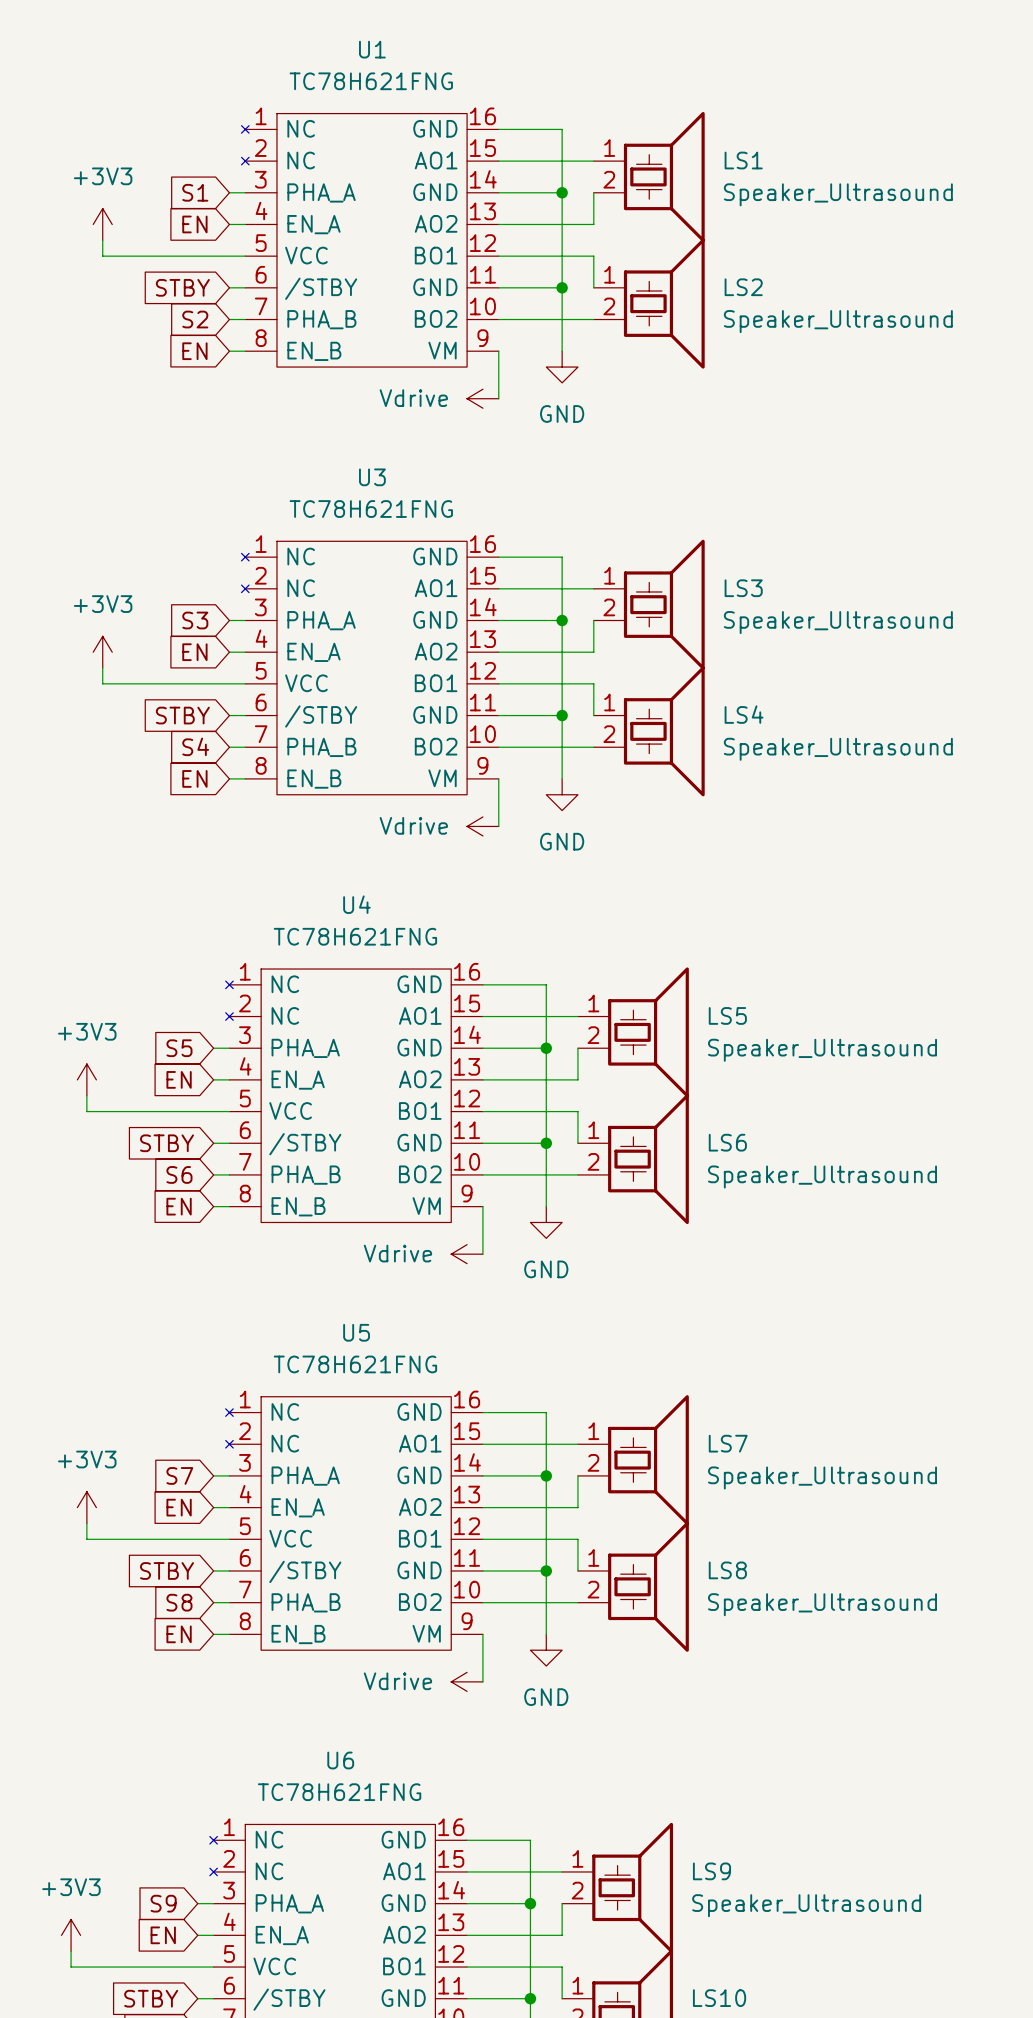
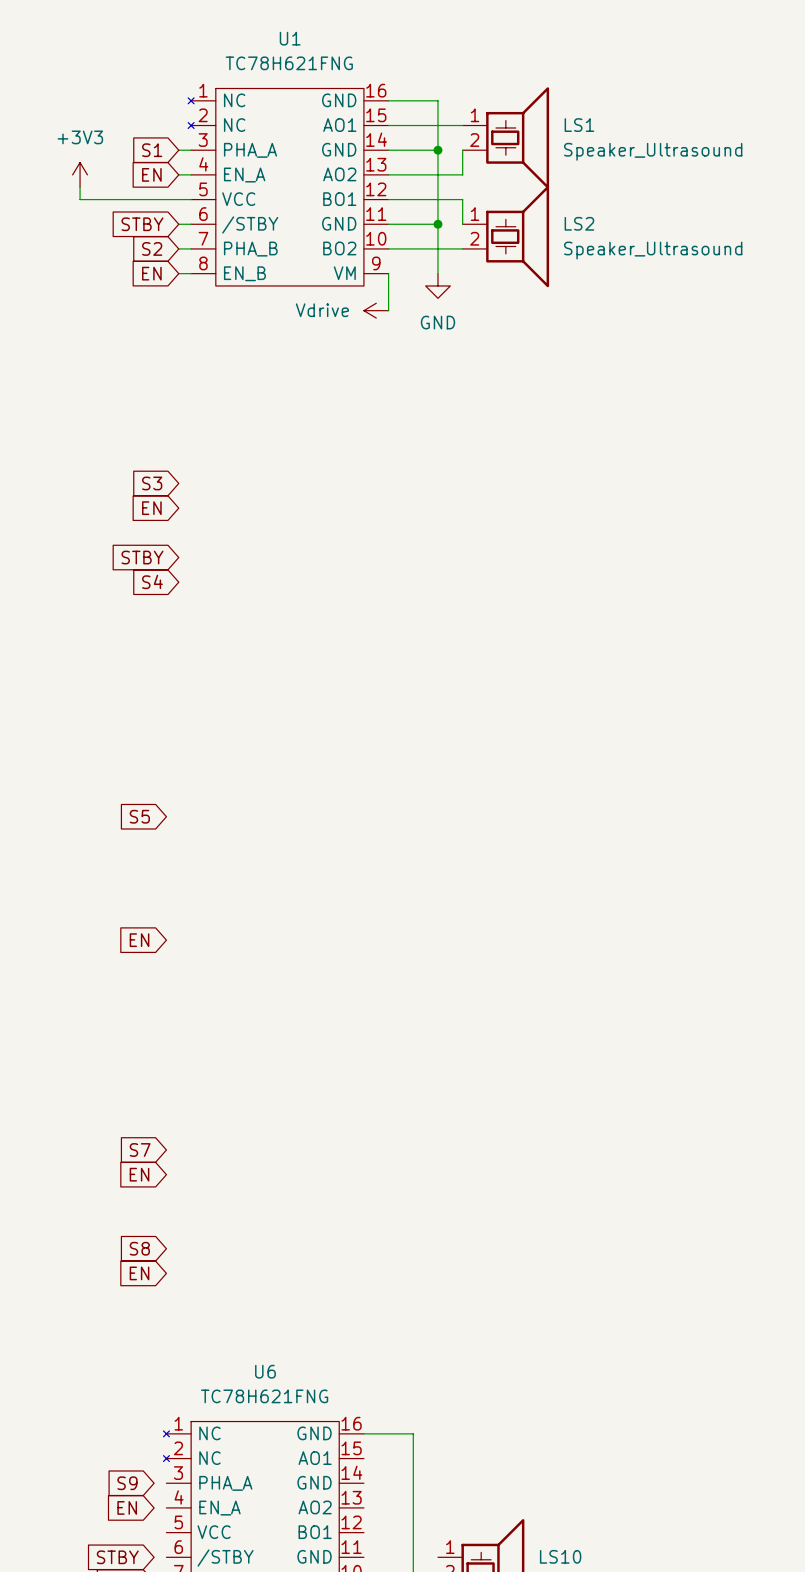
wire: (498, 557) (562, 557) (562, 778) -> none
wire: (498, 588) (593, 588) -> none
LS3: Speaker_Ultrasound (649, 604) -> none
wire: (229, 620) (245, 620) -> none
wire: (498, 620) (562, 620) -> none
junction: (562, 620) -> none
wire: (593, 620) (593, 652) (498, 652) -> none
power symbol: +3V3 (102, 652) -> none
wire: (229, 652) (245, 652) -> none
wire: (102, 668) (102, 683) (245, 683) -> none
U3: TC78H621FNG (370, 668) -> none
wire: (498, 683) (593, 683) (593, 715) -> none
wire: (229, 715) (245, 715) -> none
wire: (498, 715) (562, 715) -> none
junction: (562, 715) -> none
LS4: Speaker_Ultrasound (649, 731) -> none
wire: (229, 747) (245, 747) -> none
wire: (498, 747) (593, 747) -> none
global label: EN (194, 778) -> none
wire: (229, 778) (245, 778) -> none
wire: (498, 778) (498, 826) -> none
power symbol: GND (562, 794) -> none
power symbol: Vdrive (482, 826) -> none
wire: (482, 984) (546, 984) (546, 1206) -> none
wire: (482, 1016) (577, 1016) -> none
LS5: Speaker_Ultrasound (633, 1032) -> none
wire: (213, 1048) (229, 1048) -> none
wire: (482, 1048) (546, 1048) -> none
junction: (546, 1048) -> none
wire: (577, 1048) (577, 1079) (482, 1079) -> none
power symbol: +3V3 (86, 1079) -> none
global label: EN (179, 1079) -> none
wire: (213, 1079) (229, 1079) -> none
wire: (86, 1095) (86, 1111) (229, 1111) -> none
U4: TC78H621FNG (354, 1095) -> none
wire: (482, 1111) (577, 1111) (577, 1143) -> none
global label: STBY (167, 1143) -> none
wire: (213, 1143) (229, 1143) -> none
wire: (482, 1143) (546, 1143) -> none
junction: (546, 1143) -> none
LS6: Speaker_Ultrasound (633, 1159) -> none
global label: S6 (179, 1174) -> none
wire: (213, 1174) (229, 1174) -> none
wire: (482, 1174) (577, 1174) -> none
wire: (213, 1206) (229, 1206) -> none
wire: (482, 1206) (482, 1254) -> none
power symbol: GND (546, 1222) -> none
power symbol: Vdrive (467, 1254) -> none
wire: (482, 1412) (546, 1412) (546, 1634) -> none
wire: (482, 1444) (577, 1444) -> none
LS7: Speaker_Ultrasound (633, 1460) -> none
wire: (213, 1475) (229, 1475) -> none
wire: (482, 1475) (546, 1475) -> none
junction: (546, 1475) -> none
wire: (577, 1475) (577, 1507) (482, 1507) -> none
power symbol: +3V3 (86, 1507) -> none
wire: (213, 1507) (229, 1507) -> none
wire: (86, 1523) (86, 1539) (229, 1539) -> none
U5: TC78H621FNG (354, 1523) -> none
wire: (482, 1539) (577, 1539) (577, 1570) -> none
global label: STBY (167, 1570) -> none
wire: (213, 1570) (229, 1570) -> none
wire: (482, 1570) (546, 1570) -> none
junction: (546, 1570) -> none
LS8: Speaker_Ultrasound (633, 1586) -> none
wire: (213, 1602) (229, 1602) -> none
wire: (482, 1602) (577, 1602) -> none
wire: (213, 1634) (229, 1634) -> none
wire: (482, 1634) (482, 1681) -> none
power symbol: GND (546, 1650) -> none
power symbol: Vdrive (467, 1681) -> none
wire: (467, 1871) (562, 1871) -> none
LS9: Speaker_Ultrasound (617, 1887) -> none
wire: (197, 1903) (213, 1903) -> none
wire: (467, 1903) (530, 1903) -> none
junction: (530, 1903) -> none
wire: (562, 1903) (562, 1935) (467, 1935) -> none
power symbol: +3V3 (71, 1935) -> none
wire: (197, 1935) (213, 1935) -> none
wire: (71, 1951) (71, 1967) (213, 1967) -> none
wire: (467, 1967) (562, 1967) (562, 1998) -> none
wire: (197, 1998) (213, 1998) -> none
wire: (467, 1998) (530, 1998) -> none
junction: (530, 1998) -> none

